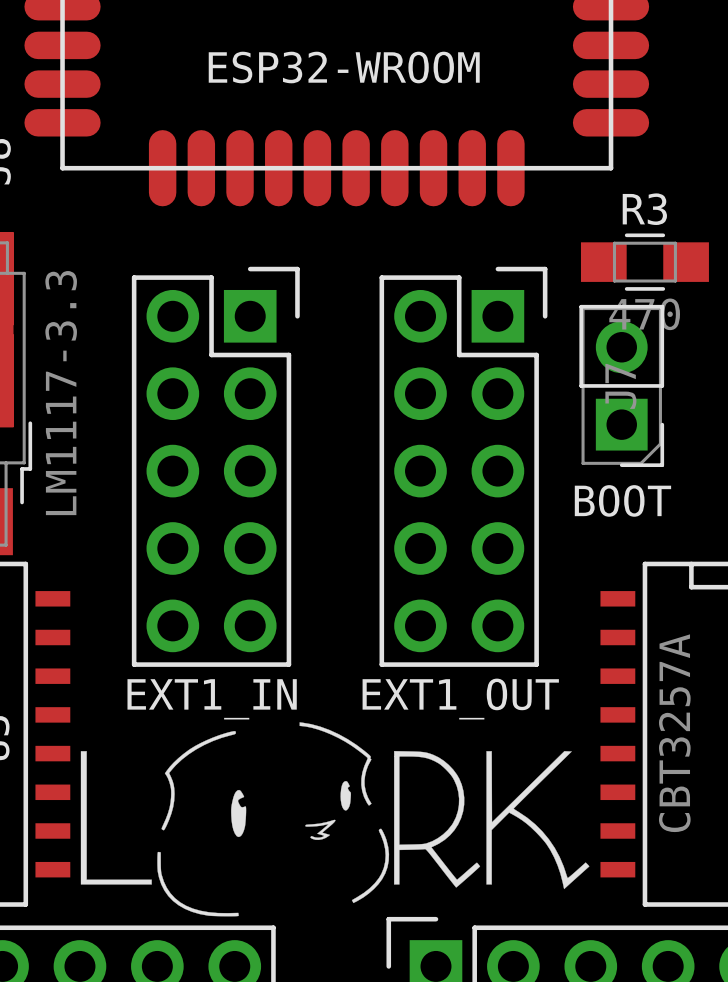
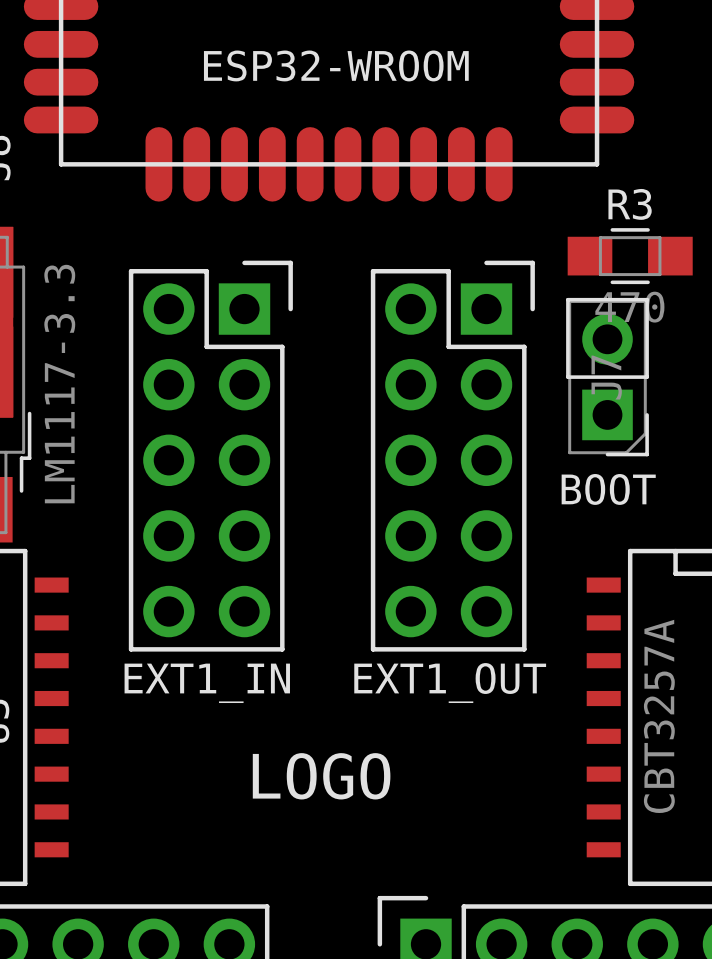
drawing: [80, 722, 590, 917] -> none
text: none -> LOGO (321, 776)

